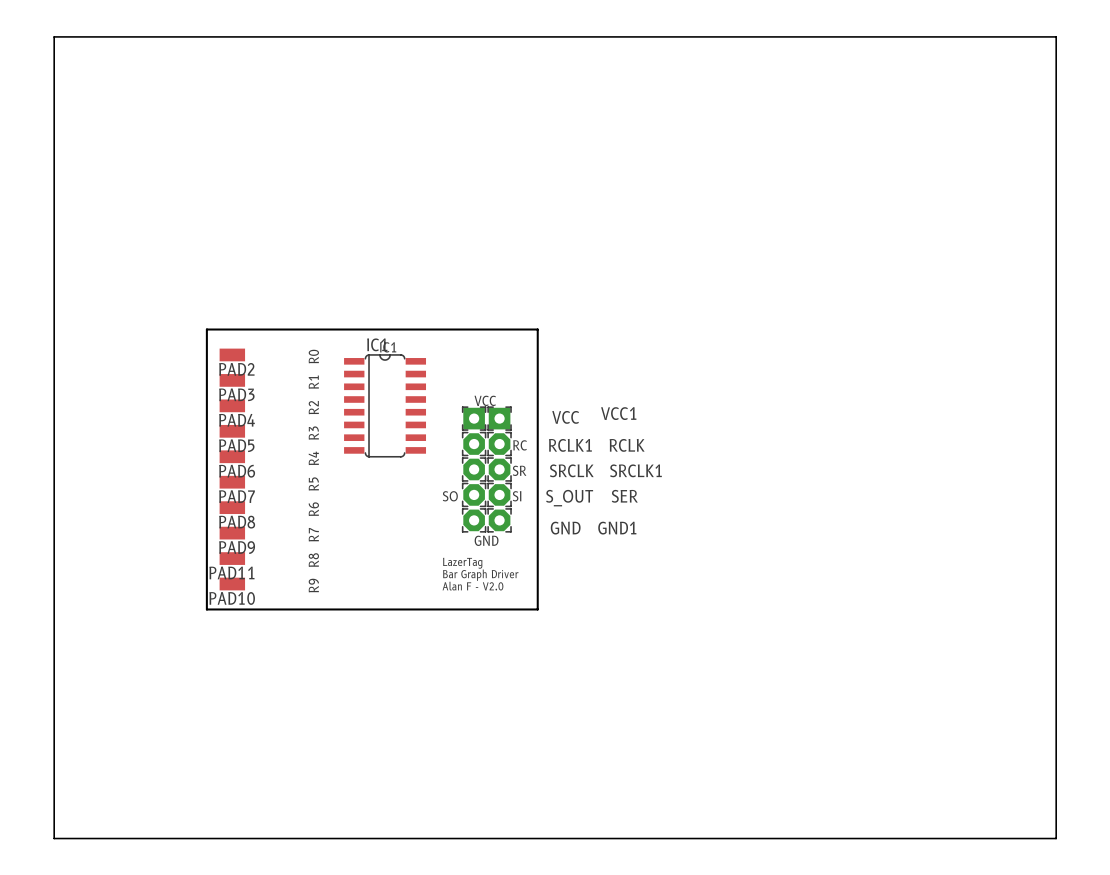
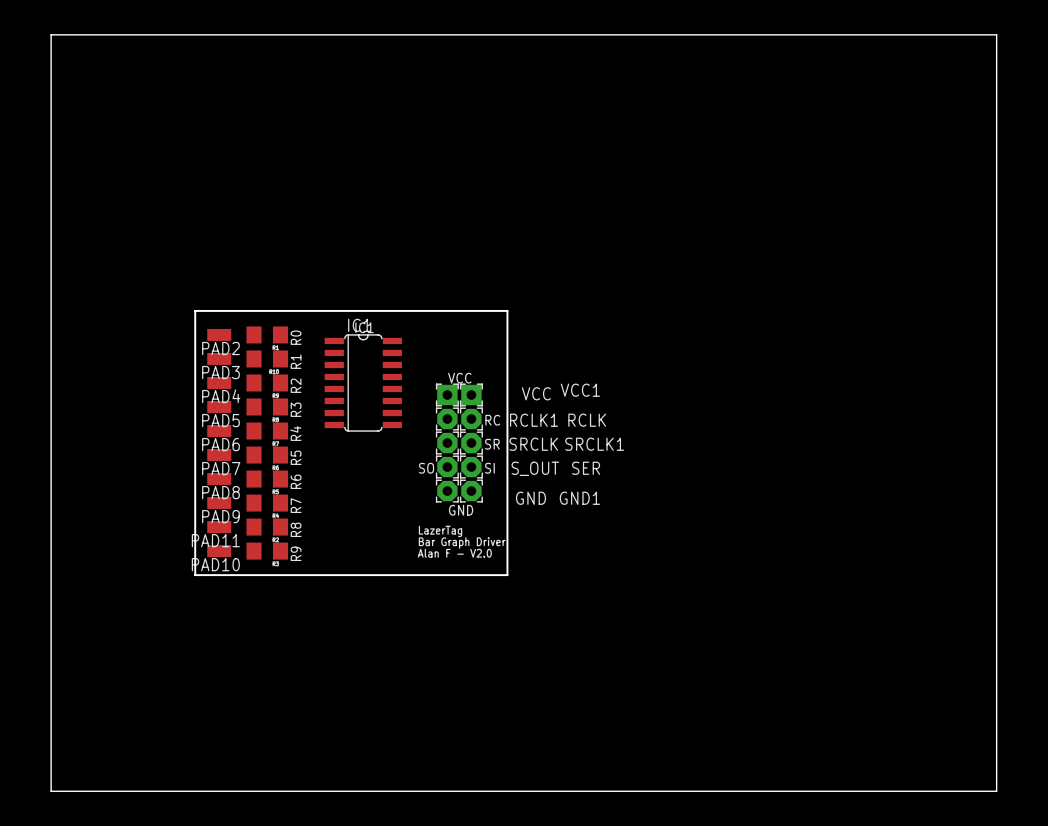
part: none -> (267, 334)
part: none -> (267, 358)
part: none -> (267, 382)
part: none -> (267, 407)
part: none -> (267, 431)
part: none -> (267, 455)
part: none -> (267, 479)
part: none -> (267, 503)
part: none -> (267, 527)
part: none -> (267, 551)

